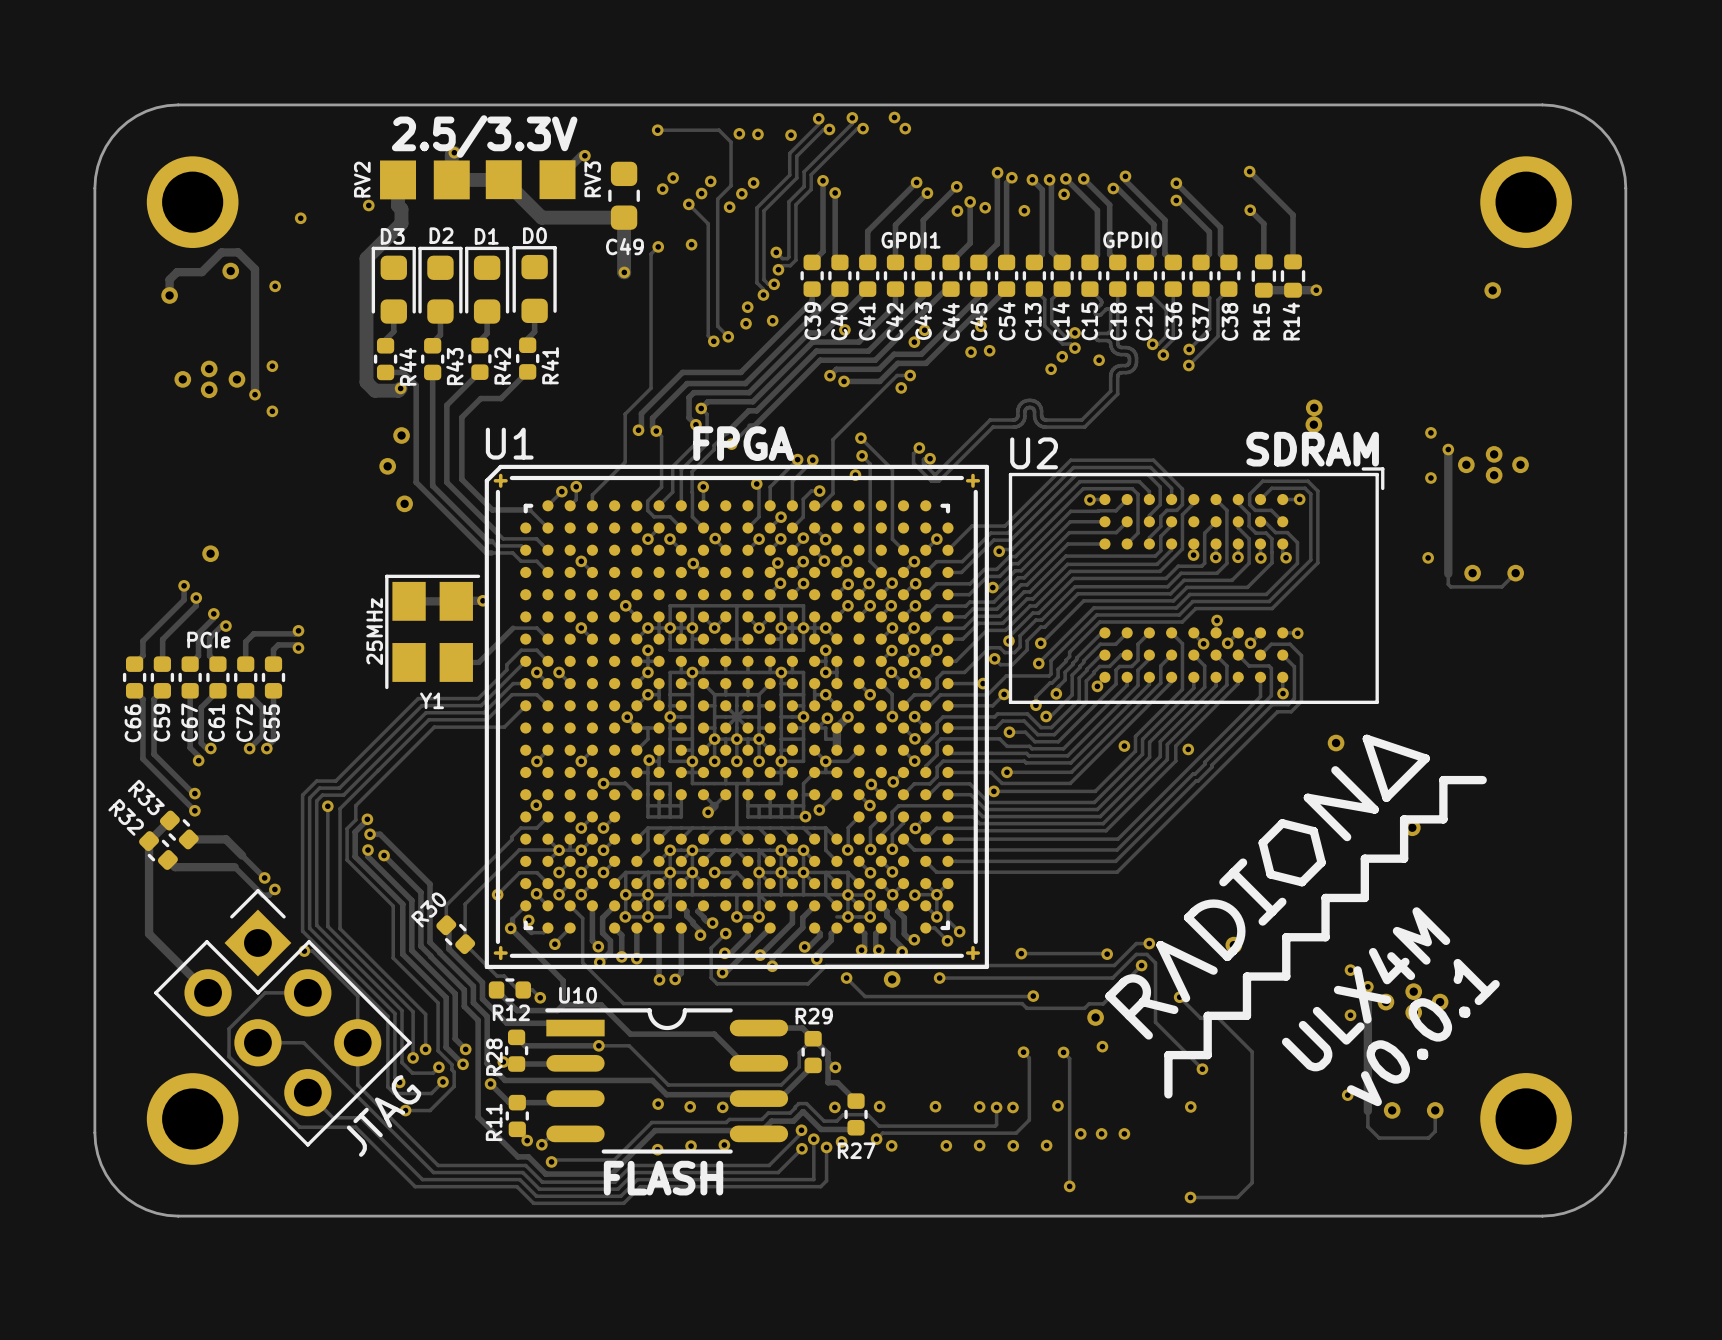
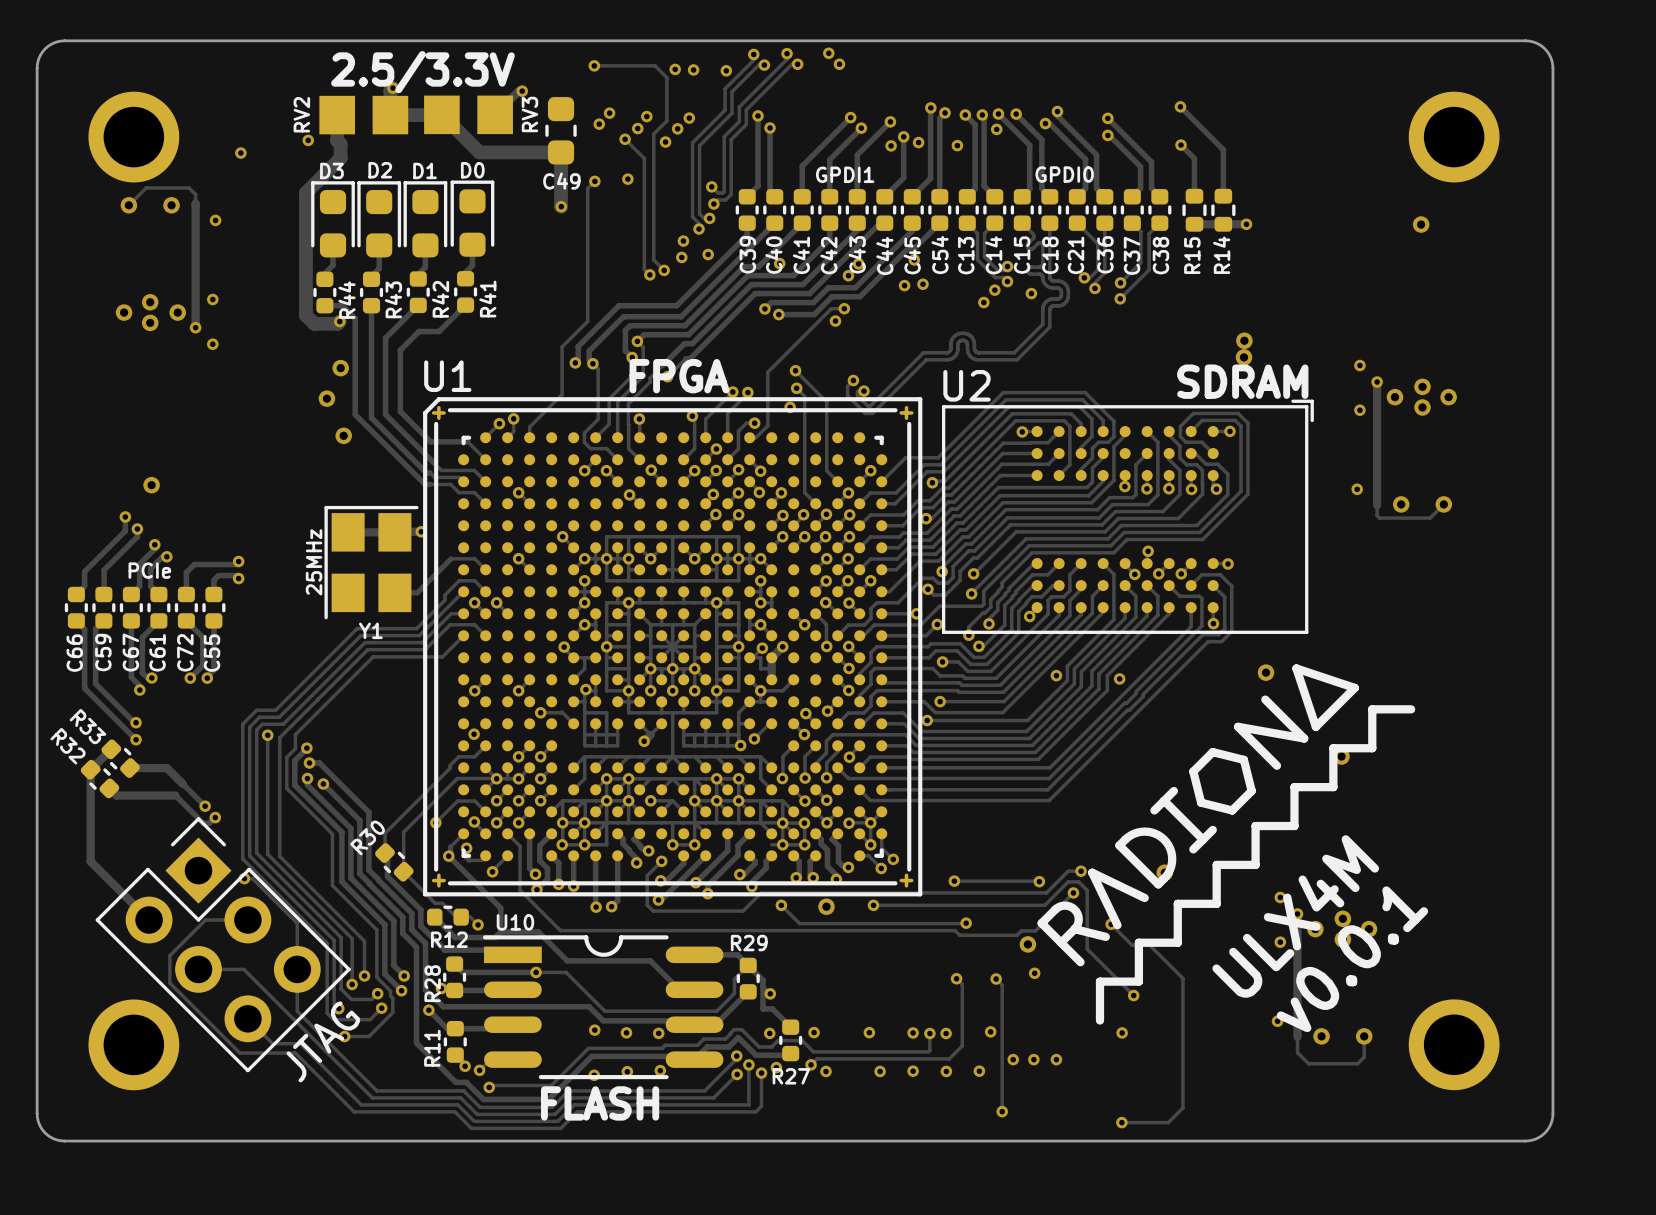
board edge: (178, 104) (146, 111) (119, 129) (101, 156) (94, 188) -> (119, 40) (61, 41) (45, 48) (37, 64) (37, 123)
board edge: (1542, 104) (1574, 111) (1601, 129) (1619, 156) (1625, 188) -> (1470, 40) (1529, 41) (1544, 48) (1552, 64) (1552, 123)
track: (255, 269) (238, 252) (221, 252) (201, 272) (177, 272) (169, 279) (169, 295) -> (195, 204) (195, 194) (189, 187) (146, 187) (128, 205)
via position: (169, 295) -> (128, 205)
board edge: (94, 1132) (101, 1164) (119, 1191) (146, 1209) (178, 1216) -> (37, 1058) (37, 1117) (45, 1132) (61, 1140) (119, 1141)
board edge: (1625, 1132) (1619, 1164) (1601, 1191) (1574, 1209) (1542, 1216) -> (1552, 1058) (1552, 1117) (1544, 1132) (1529, 1140) (1470, 1141)

